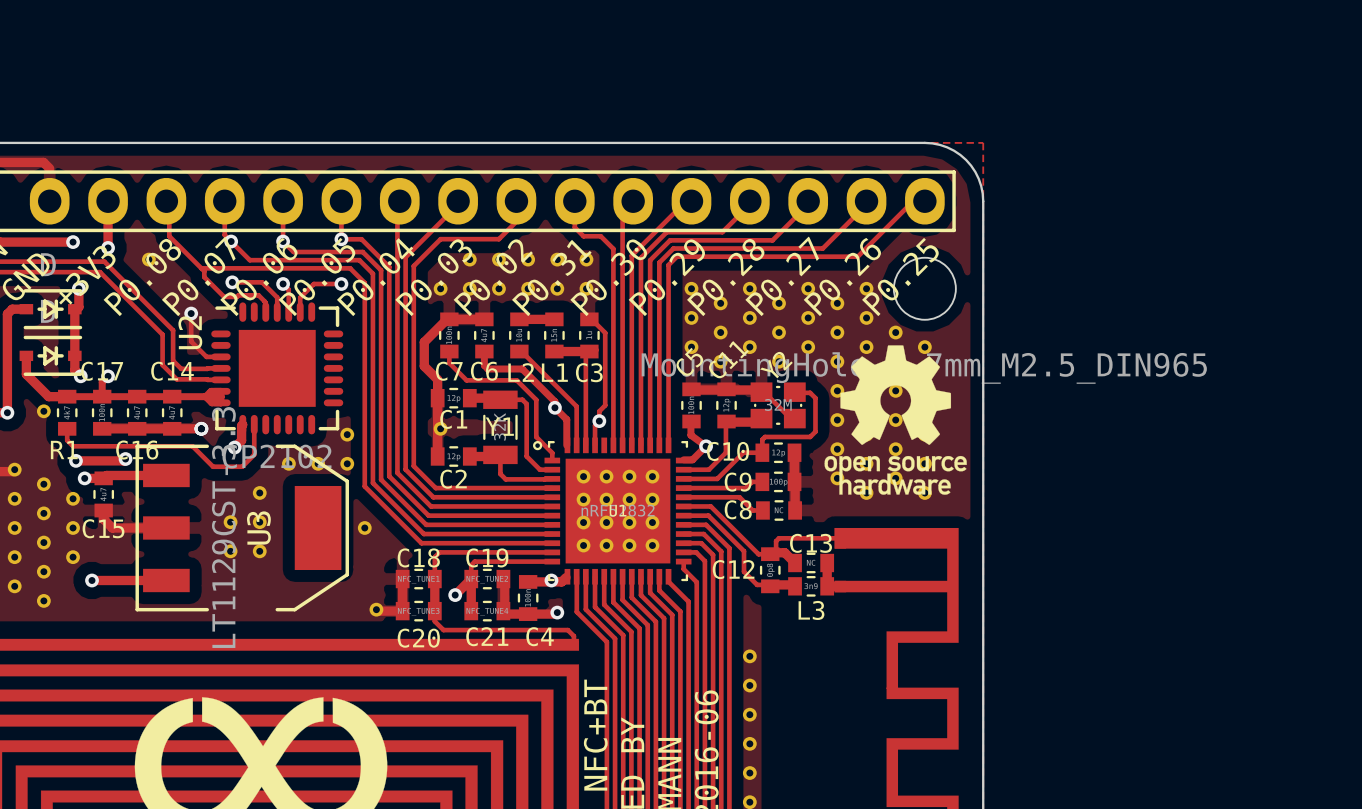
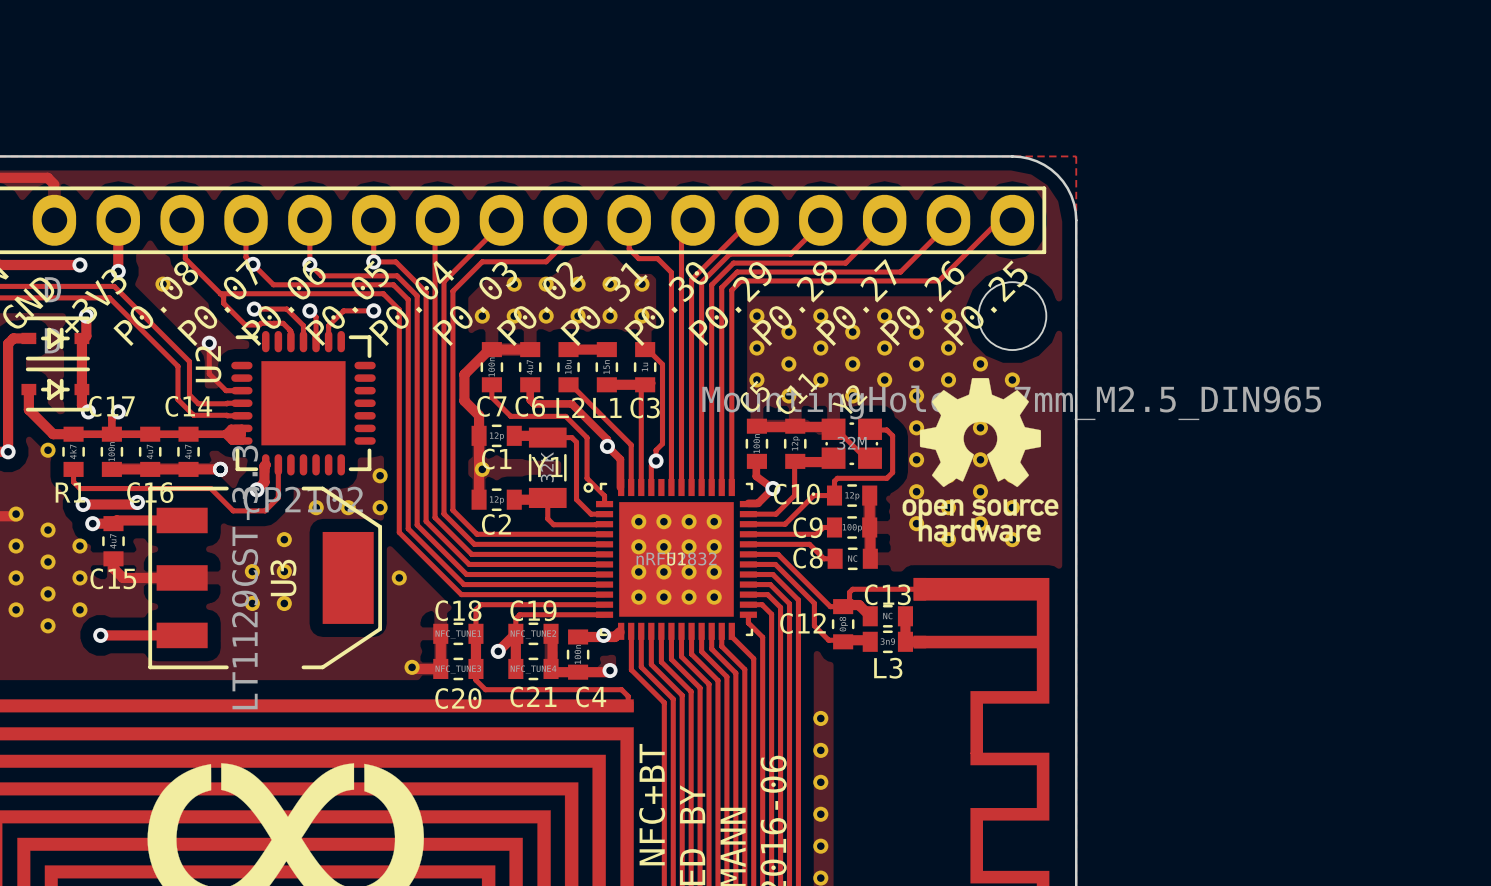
part: (14, 586) -> none
part: (43, 600) -> none

